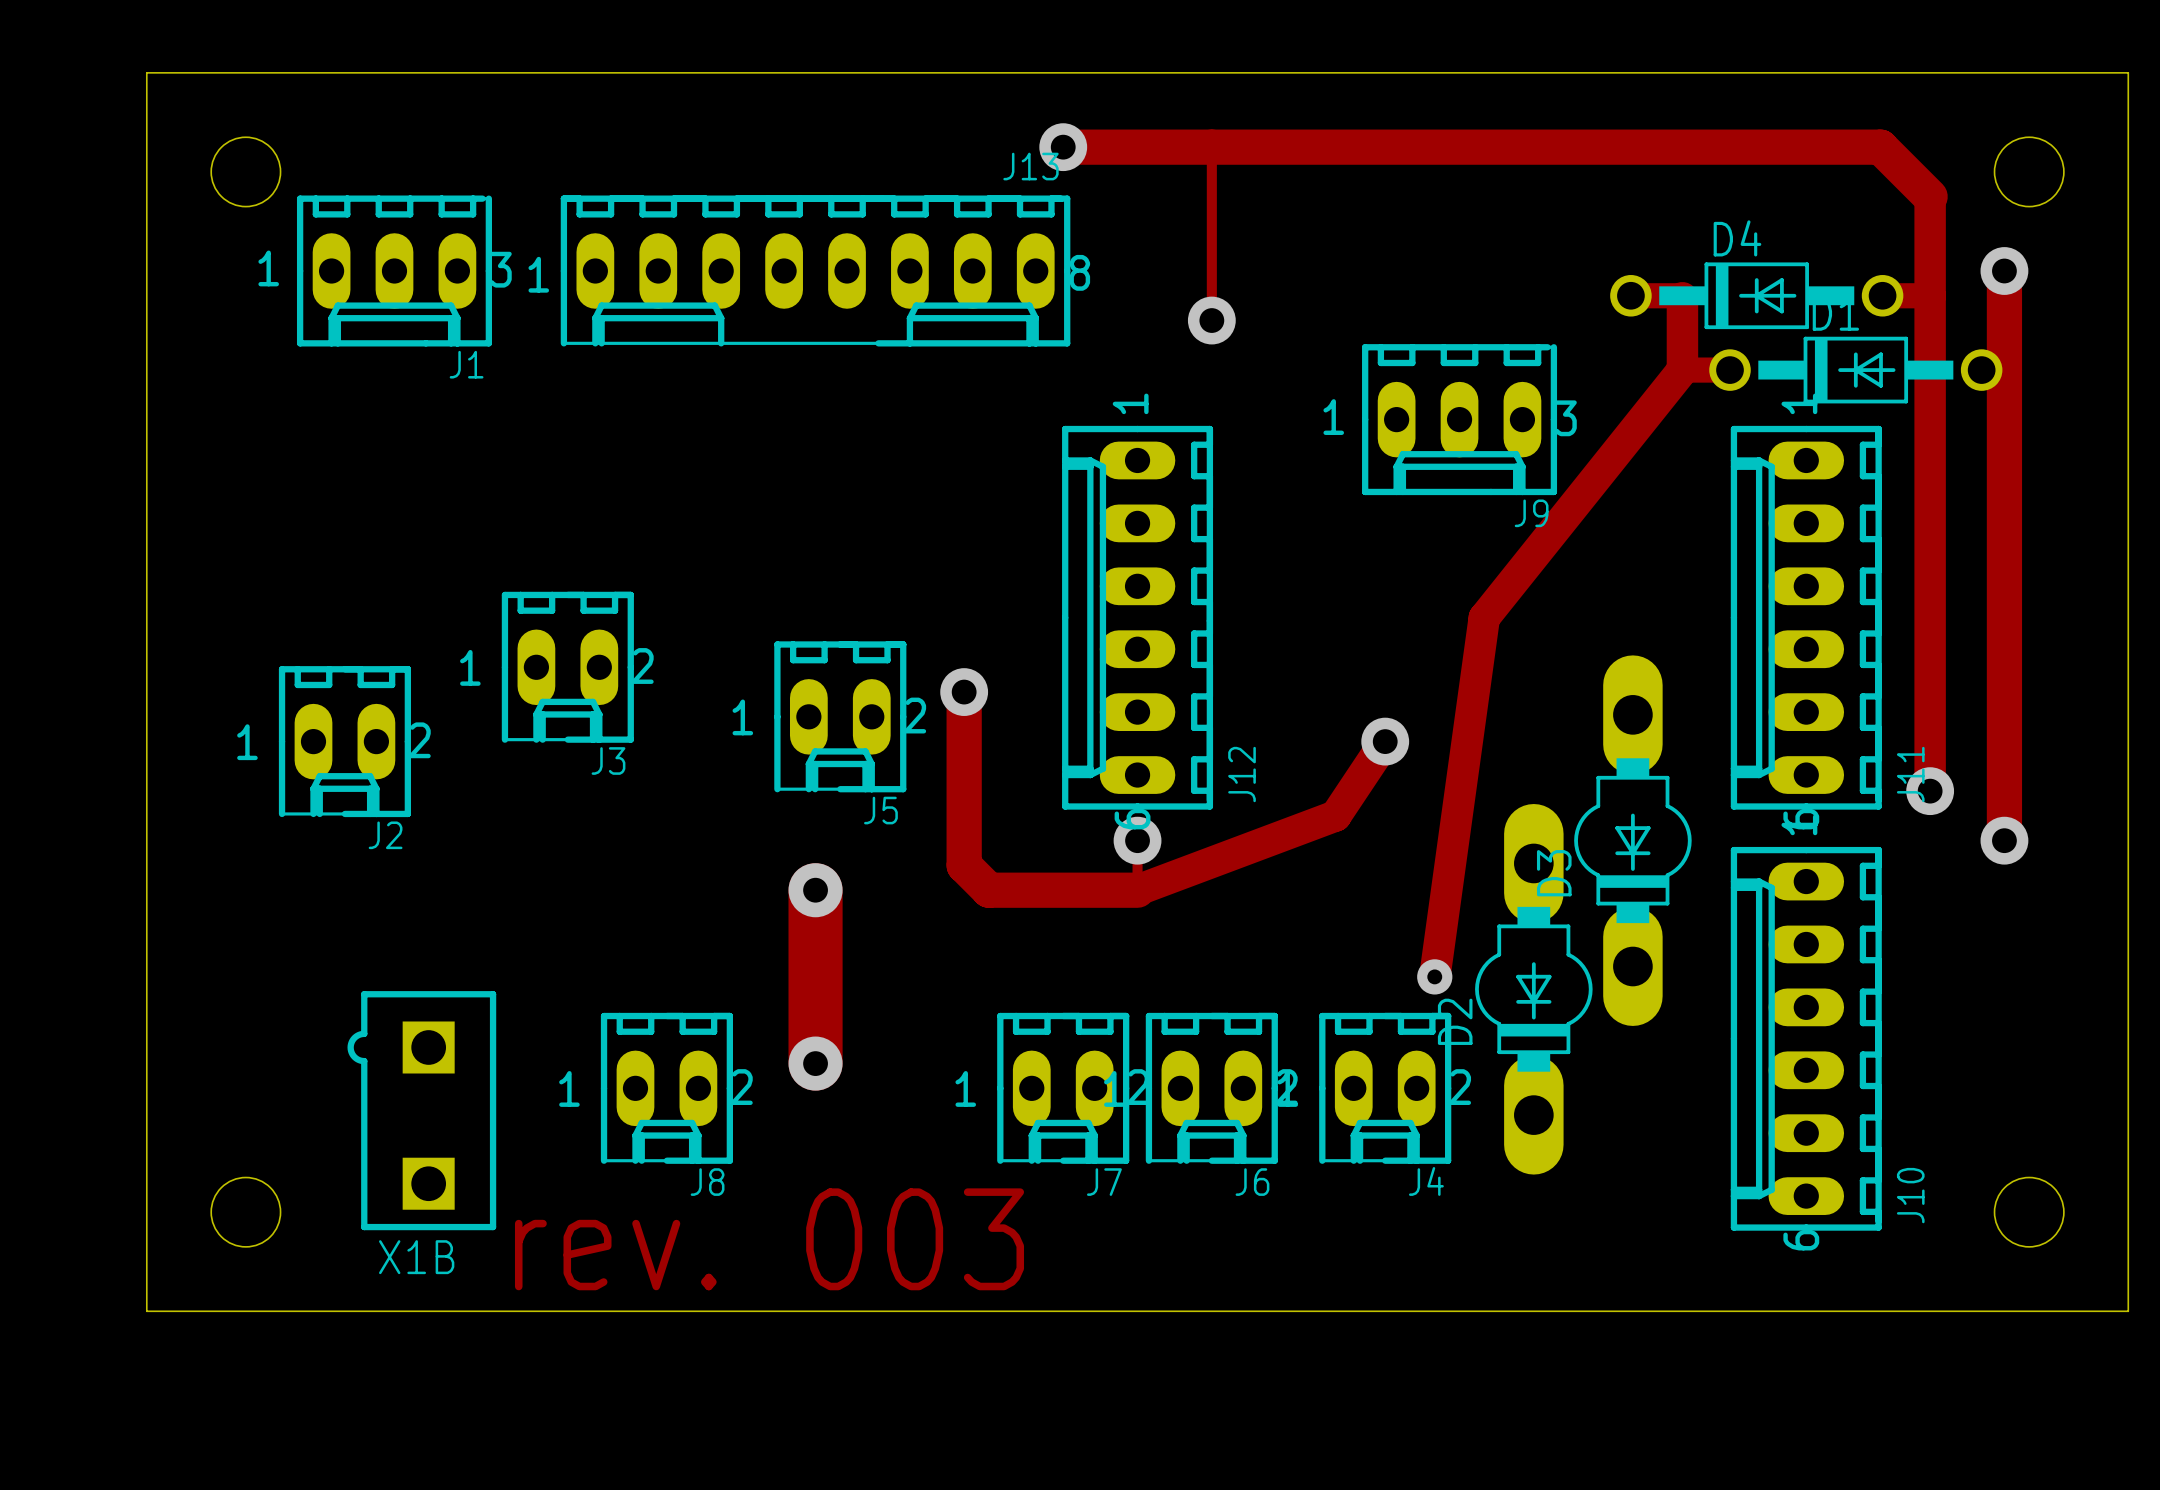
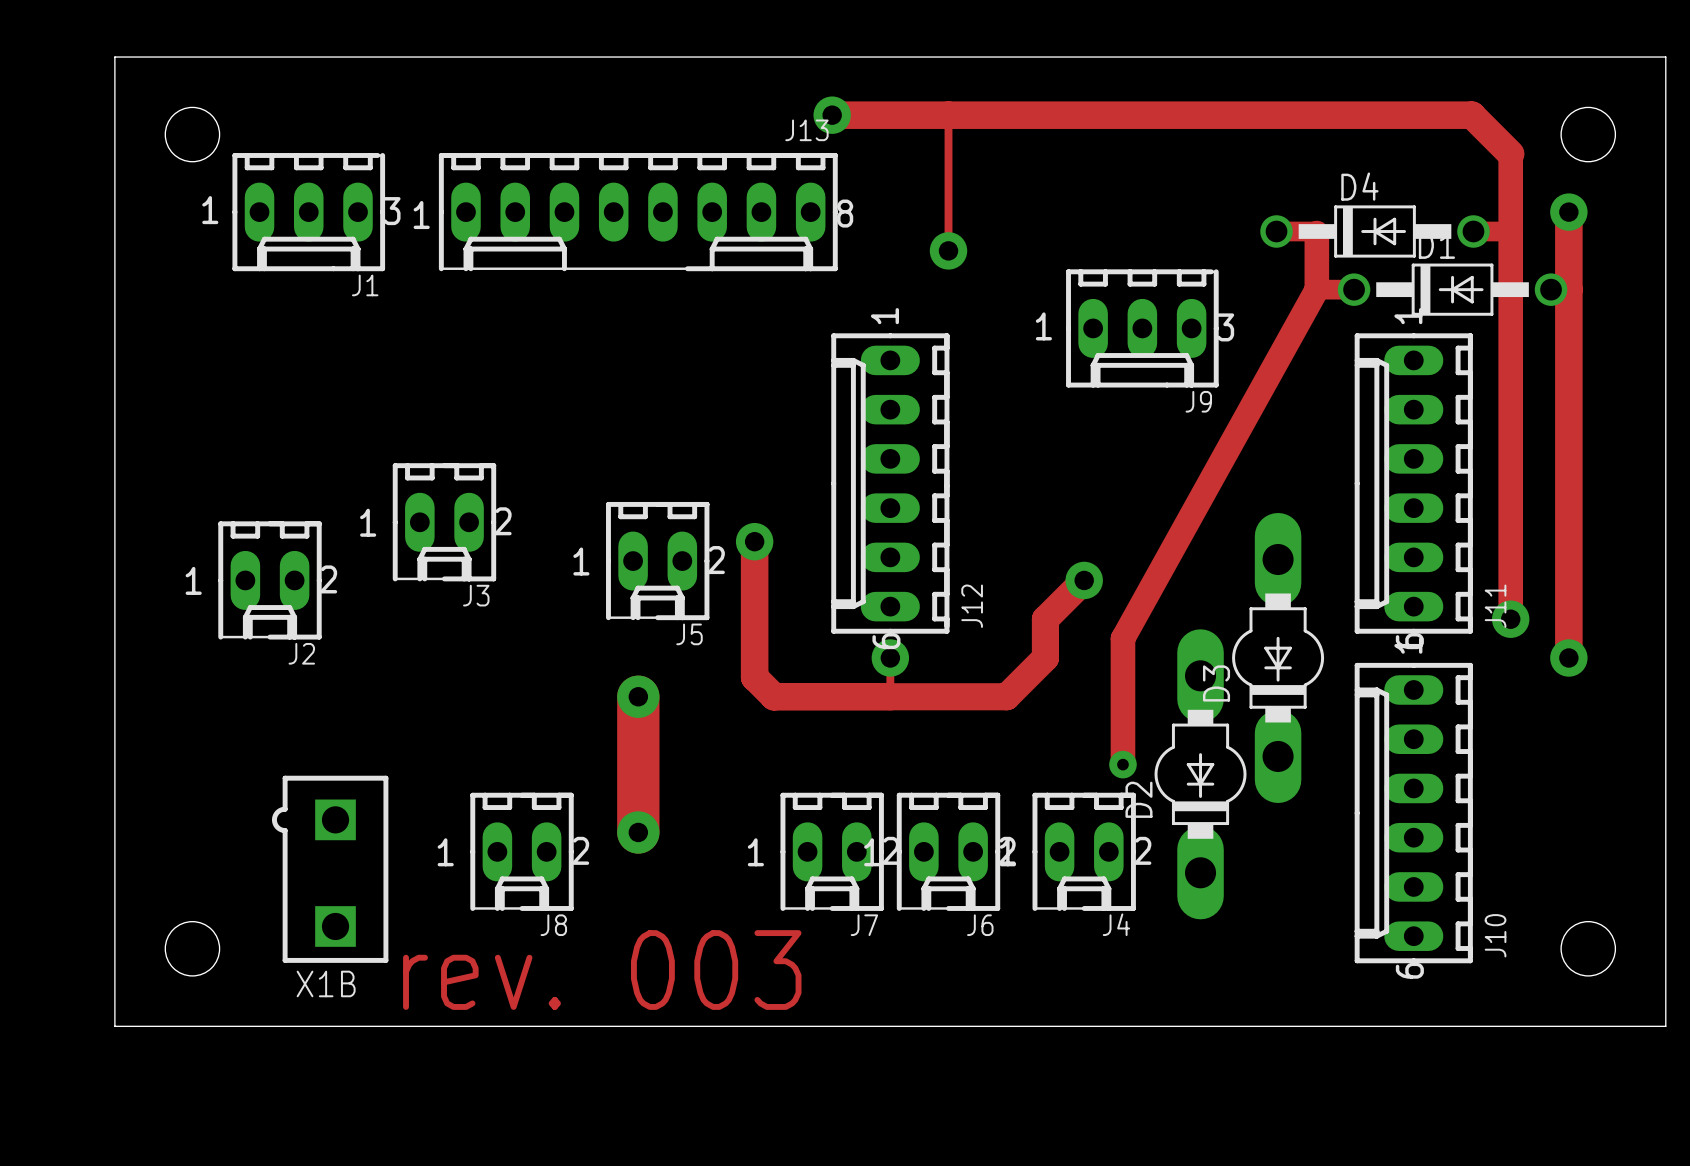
track: (1682, 370) (1484, 617) (1434, 976) -> (1316, 289) (1122, 638) (1122, 764)
track: (1385, 741) (1335, 815) (1137, 890) -> (1084, 580) (1045, 619) (1045, 657) (1006, 696) (890, 696)

